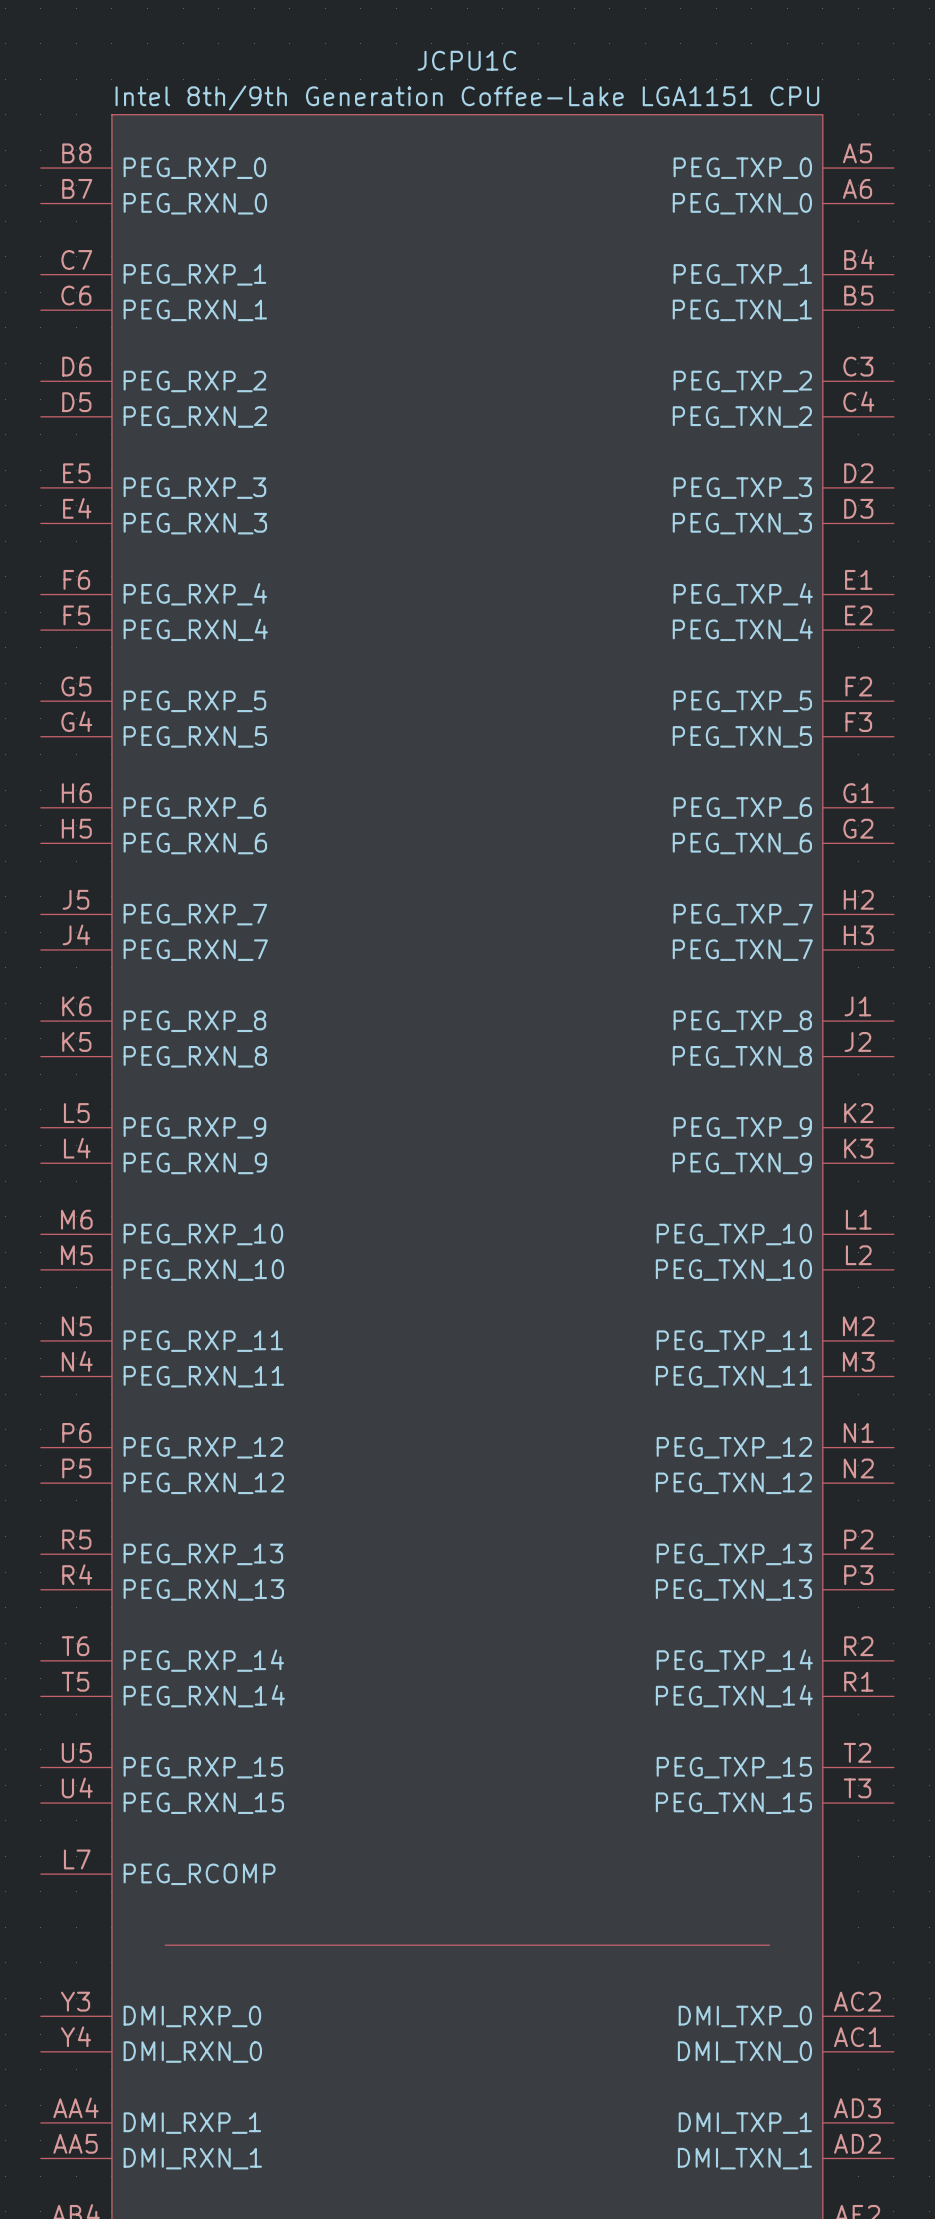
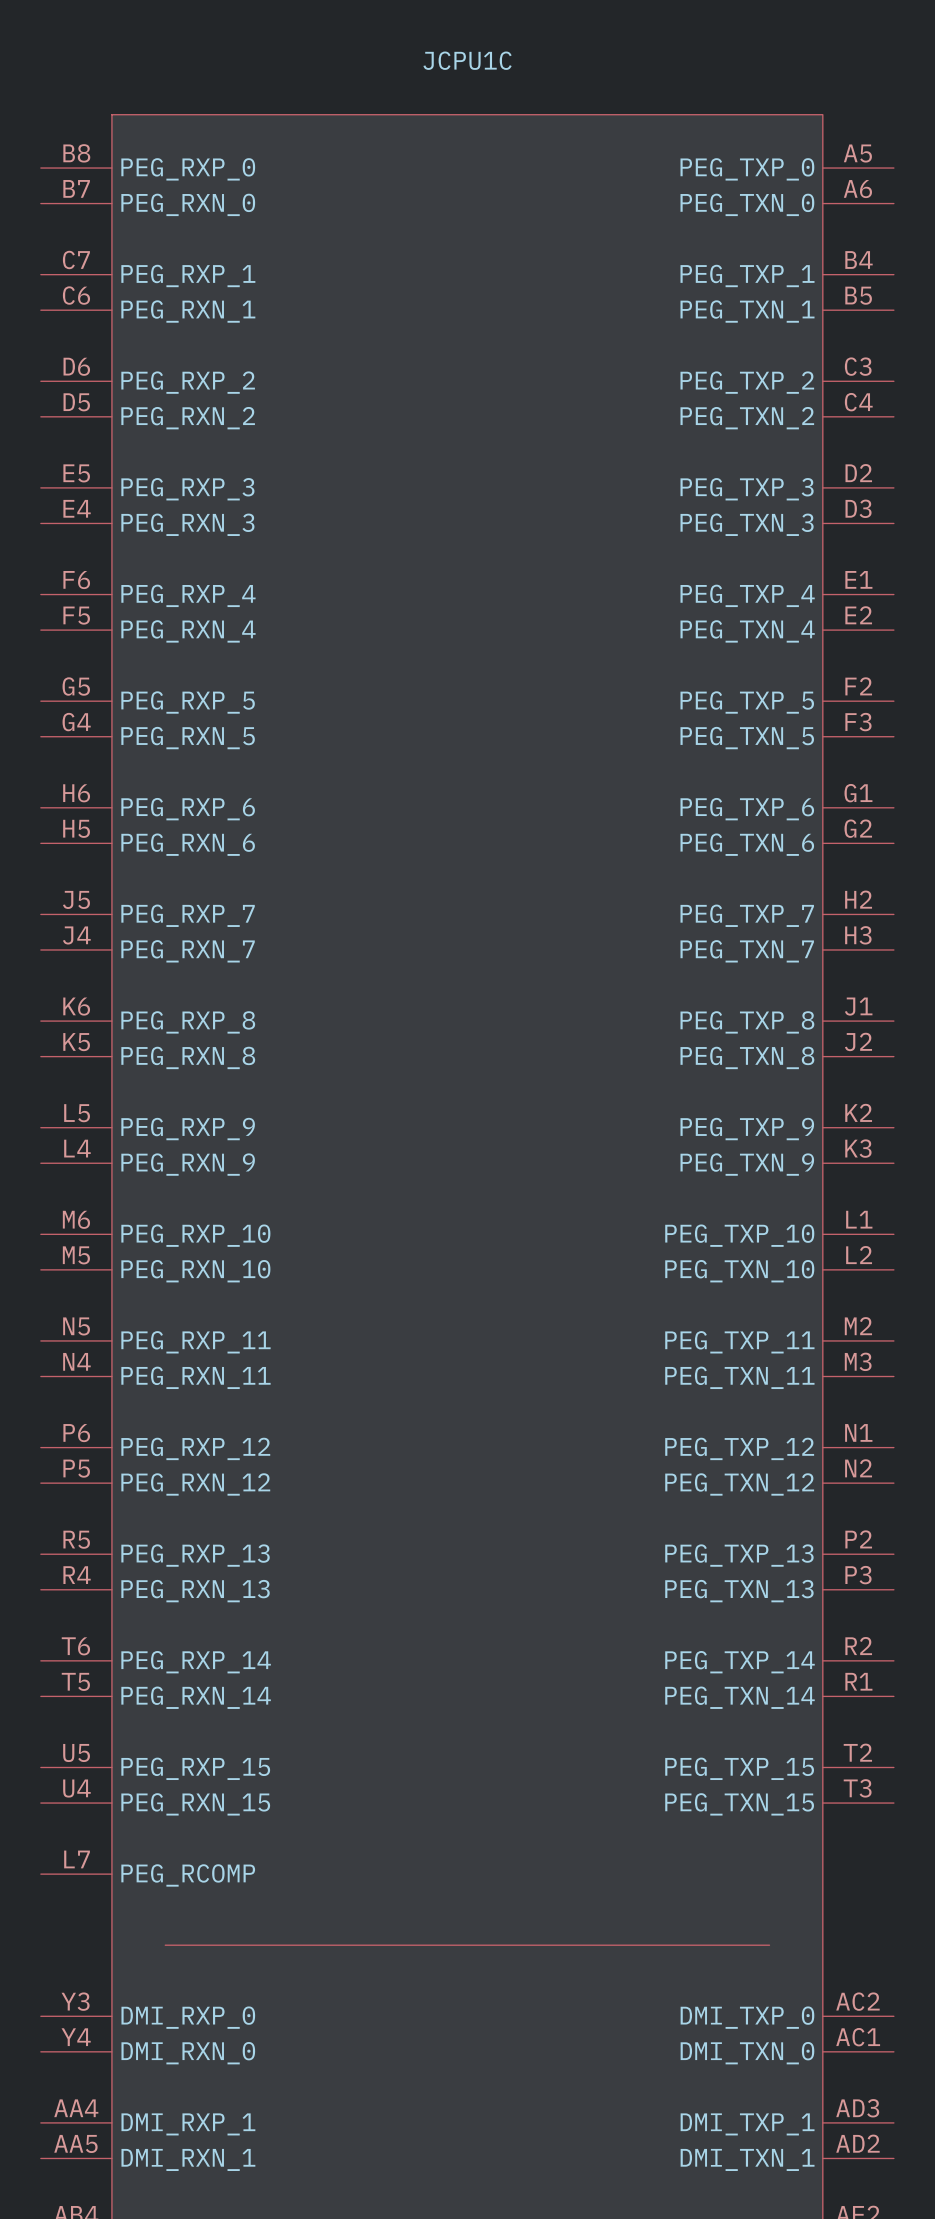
JCPU1C value: Intel 8th/9th Generation Coffee-Lake LGA1151 CPU (467, 97) -> none

